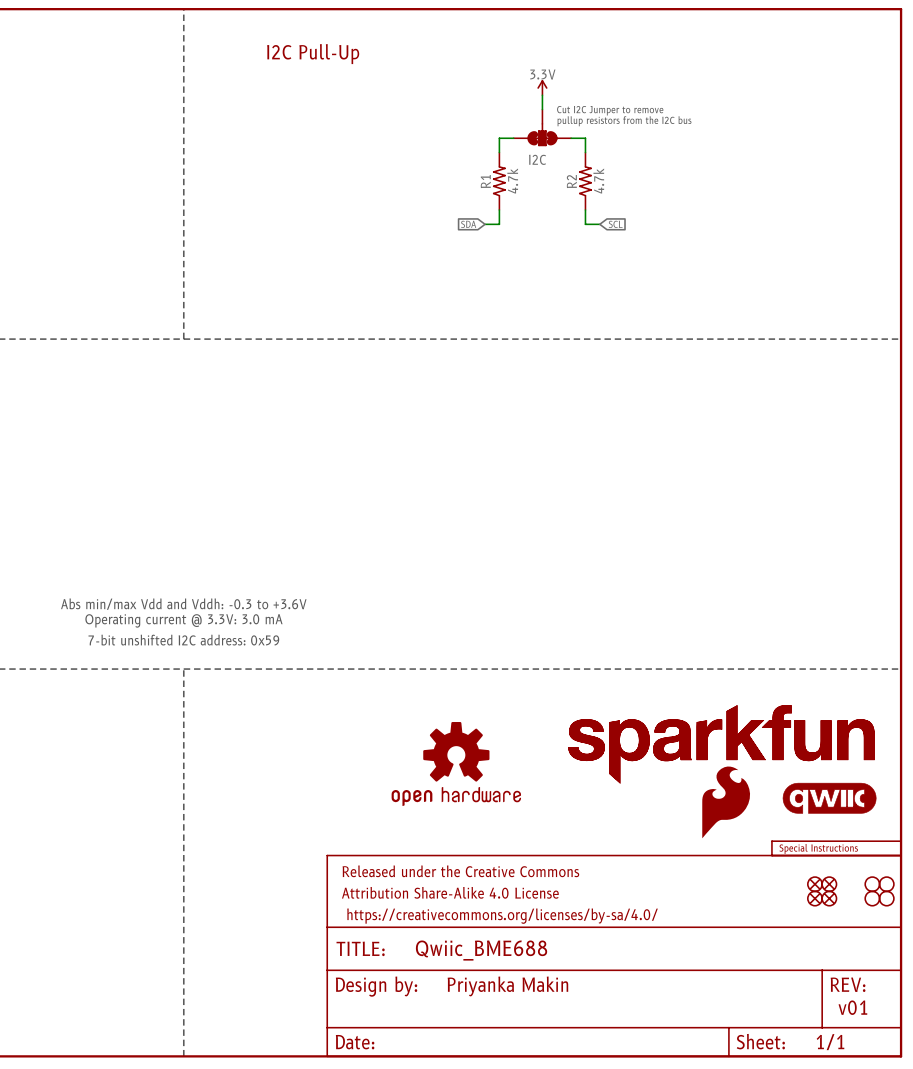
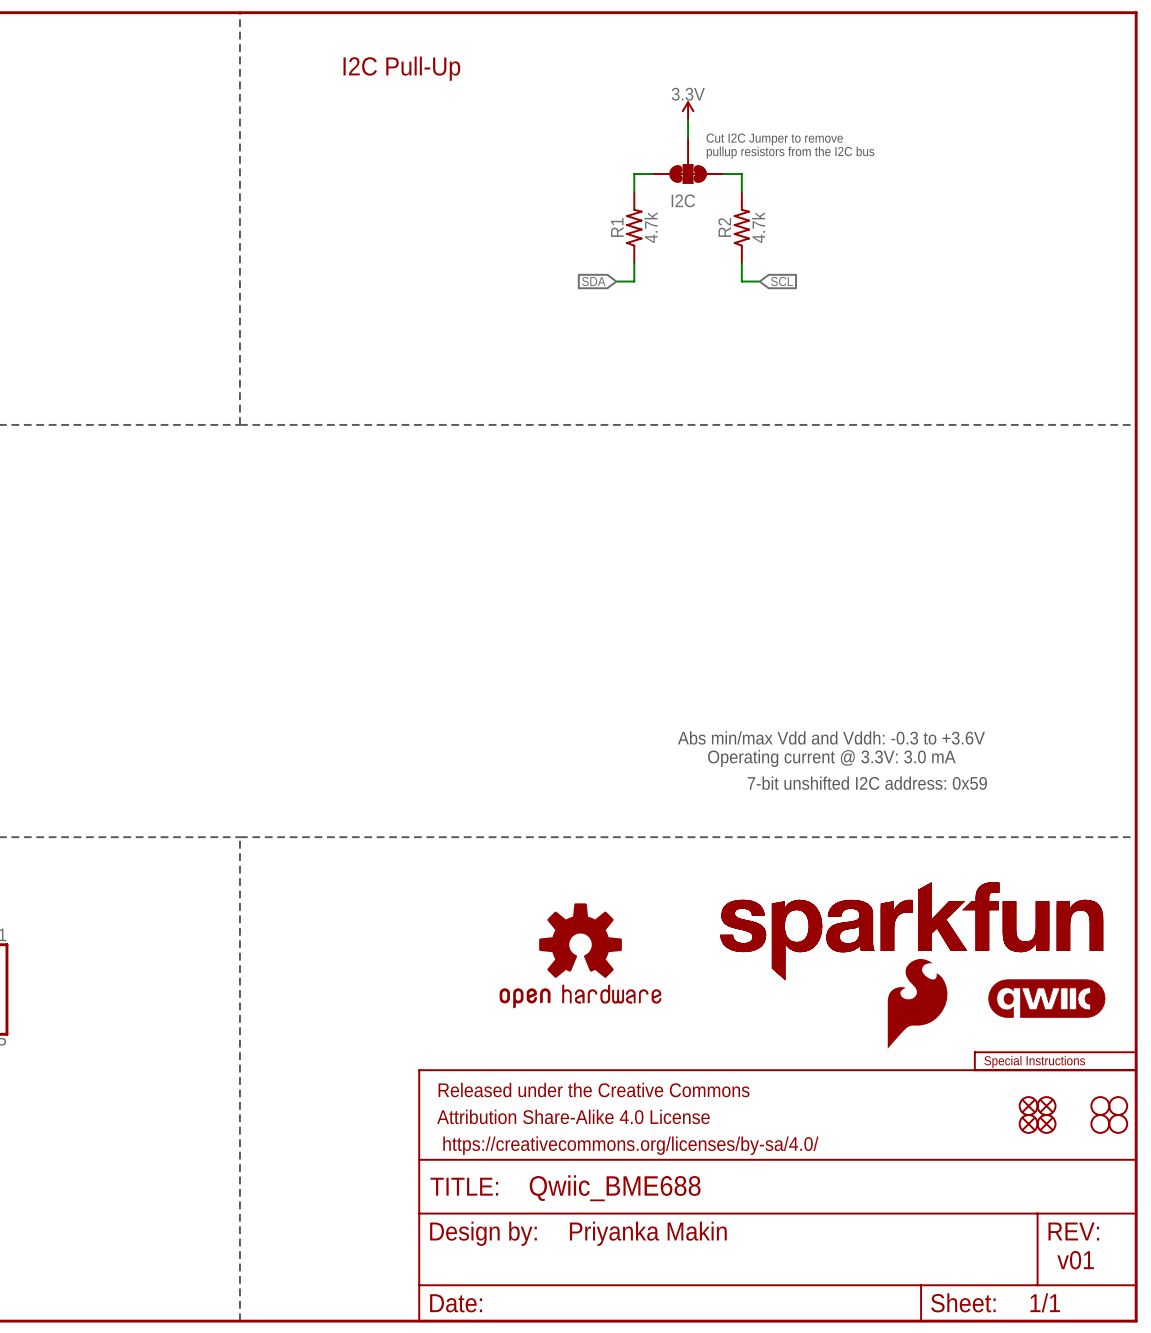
text: none -> Abs min/max Vdd and Vddh: -0.3 to +3.6V (831, 737)
text: Abs min/max Vdd and Vddh: -0.3 to +3.6V (183, 604) -> none
text: none -> Operating current @ 3.3V: 3.0 mA (831, 758)
text: Operating current @ 3.3V: 3.0 mA (183, 620) -> none
text: none -> 7-bit unshifted I2C address: 0x59 (867, 783)
text: 7-bit unshifted I2C address: 0x59 (183, 640) -> none

